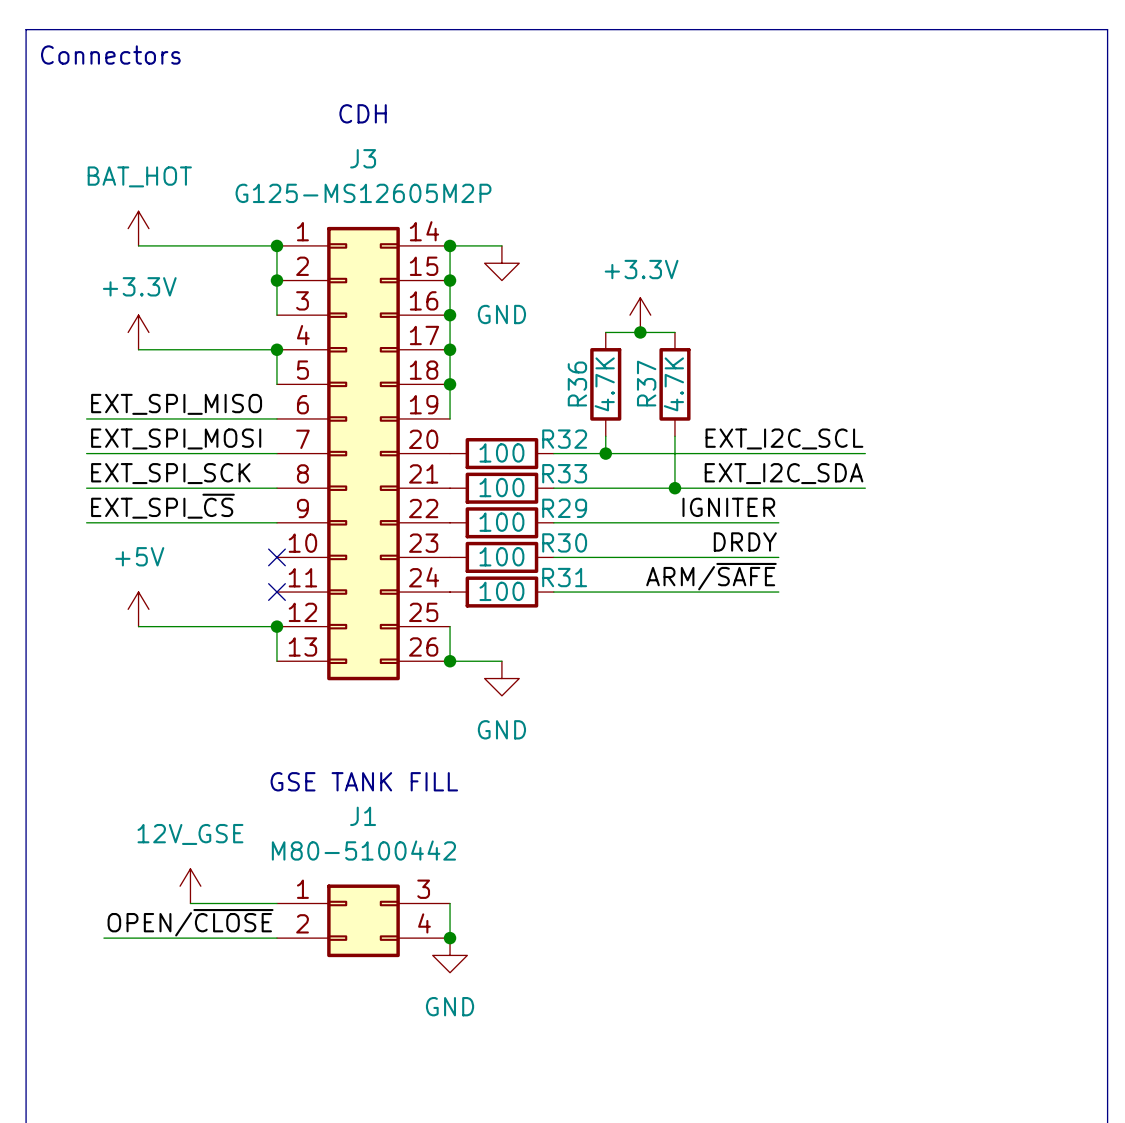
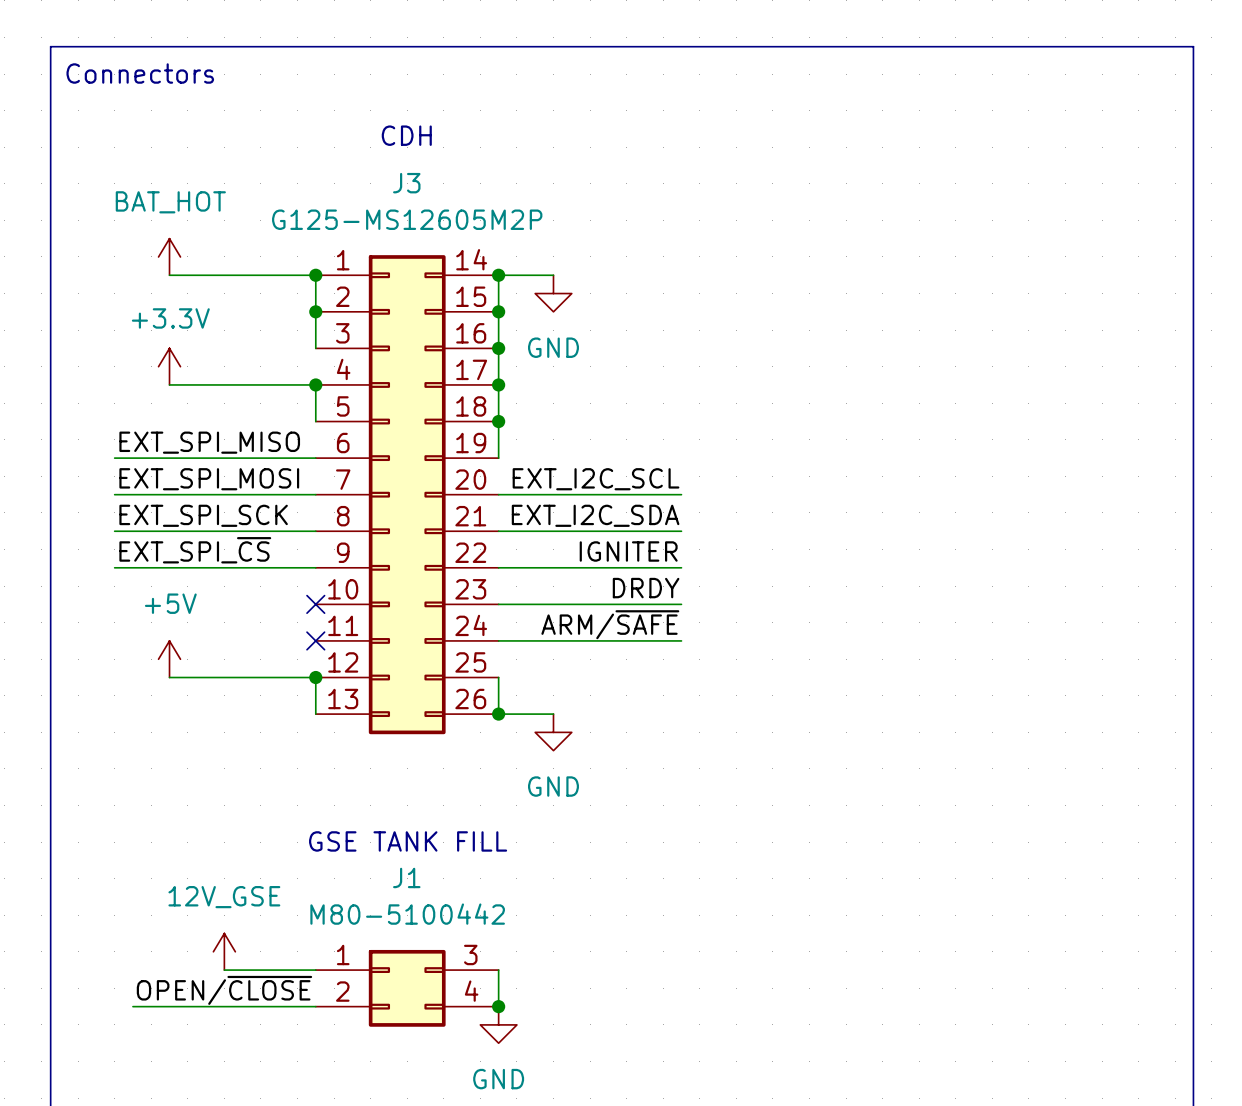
power symbol: +3.3V (640, 315) -> none
wire: (605, 332) (674, 332) -> none
junction: (640, 332) -> none
R36: 4.7K (605, 384) -> none
R37: 4.7K (674, 384) -> none
wire: (605, 436) (605, 453) -> none
wire: (674, 436) (674, 488) -> none
label position: EXT_I2C_SCL (784, 438) -> EXT_I2C_SCL (596, 479)
wire: none -> (498, 494) (608, 494)
R32: 100 (501, 453) -> none
junction: (605, 453) -> none
wire: (623, 453) (865, 453) -> none
label position: EXT_I2C_SDA (784, 473) -> EXT_I2C_SDA (595, 515)
wire: none -> (498, 531) (608, 531)
R33: 100 (501, 488) -> none
wire: (623, 488) (865, 488) -> none
junction: (674, 488) -> none
label position: IGNITER (728, 507) -> IGNITER (628, 551)
wire: none -> (498, 567) (608, 567)
R29: 100 (501, 522) -> none
wire: (623, 522) (778, 522) -> none
label position: DRDY (745, 541) -> DRDY (646, 588)
wire: none -> (498, 604) (608, 604)
R30: 100 (501, 557) -> none
wire: (623, 557) (778, 557) -> none
label position: ARM/~{SAFE} (711, 576) -> ARM/~{SAFE} (610, 624)
wire: none -> (498, 640) (608, 640)
R31: 100 (501, 592) -> none
wire: (623, 592) (778, 592) -> none

